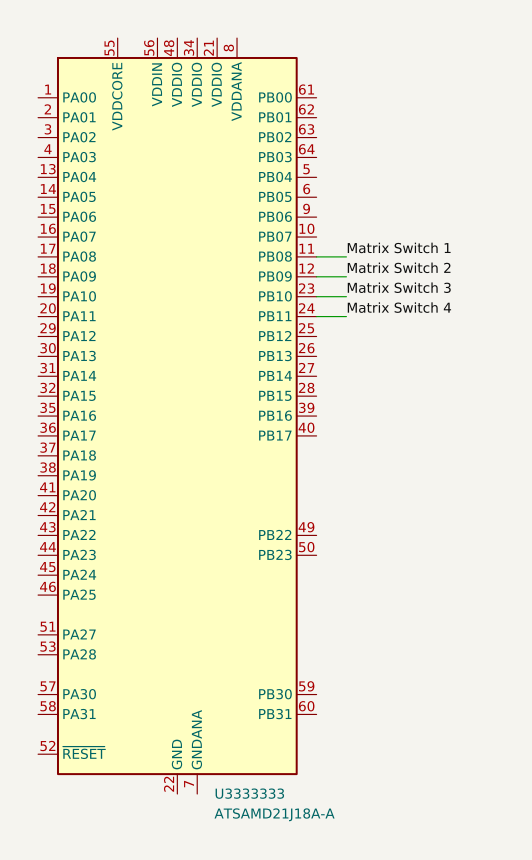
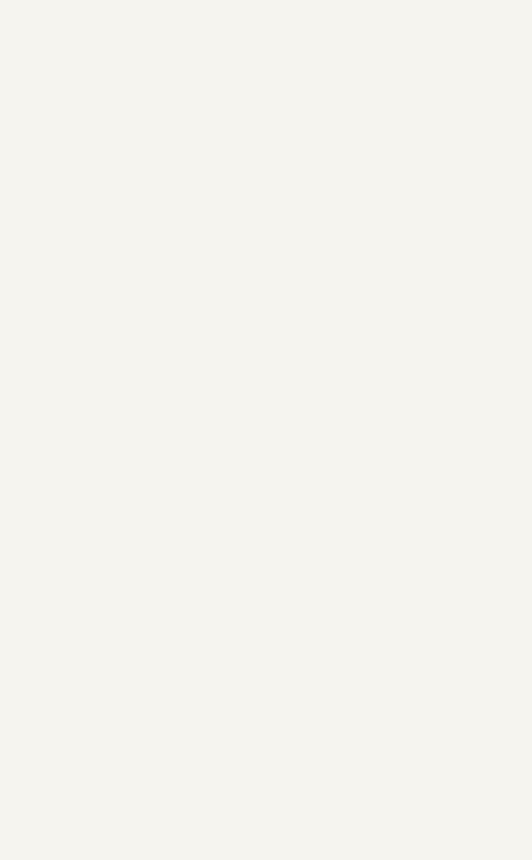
label: Matrix Switch 1 (399, 247) -> none
wire: (316, 256) (346, 256) -> none
label: Matrix Switch 2 (399, 267) -> none
wire: (316, 276) (346, 276) -> none
label: Matrix Switch 3 (399, 287) -> none
wire: (316, 296) (346, 296) -> none
label: Matrix Switch 4 (399, 307) -> none
wire: (316, 316) (346, 316) -> none
U3333333: ATSAMD21J18A-A (177, 416) -> none

